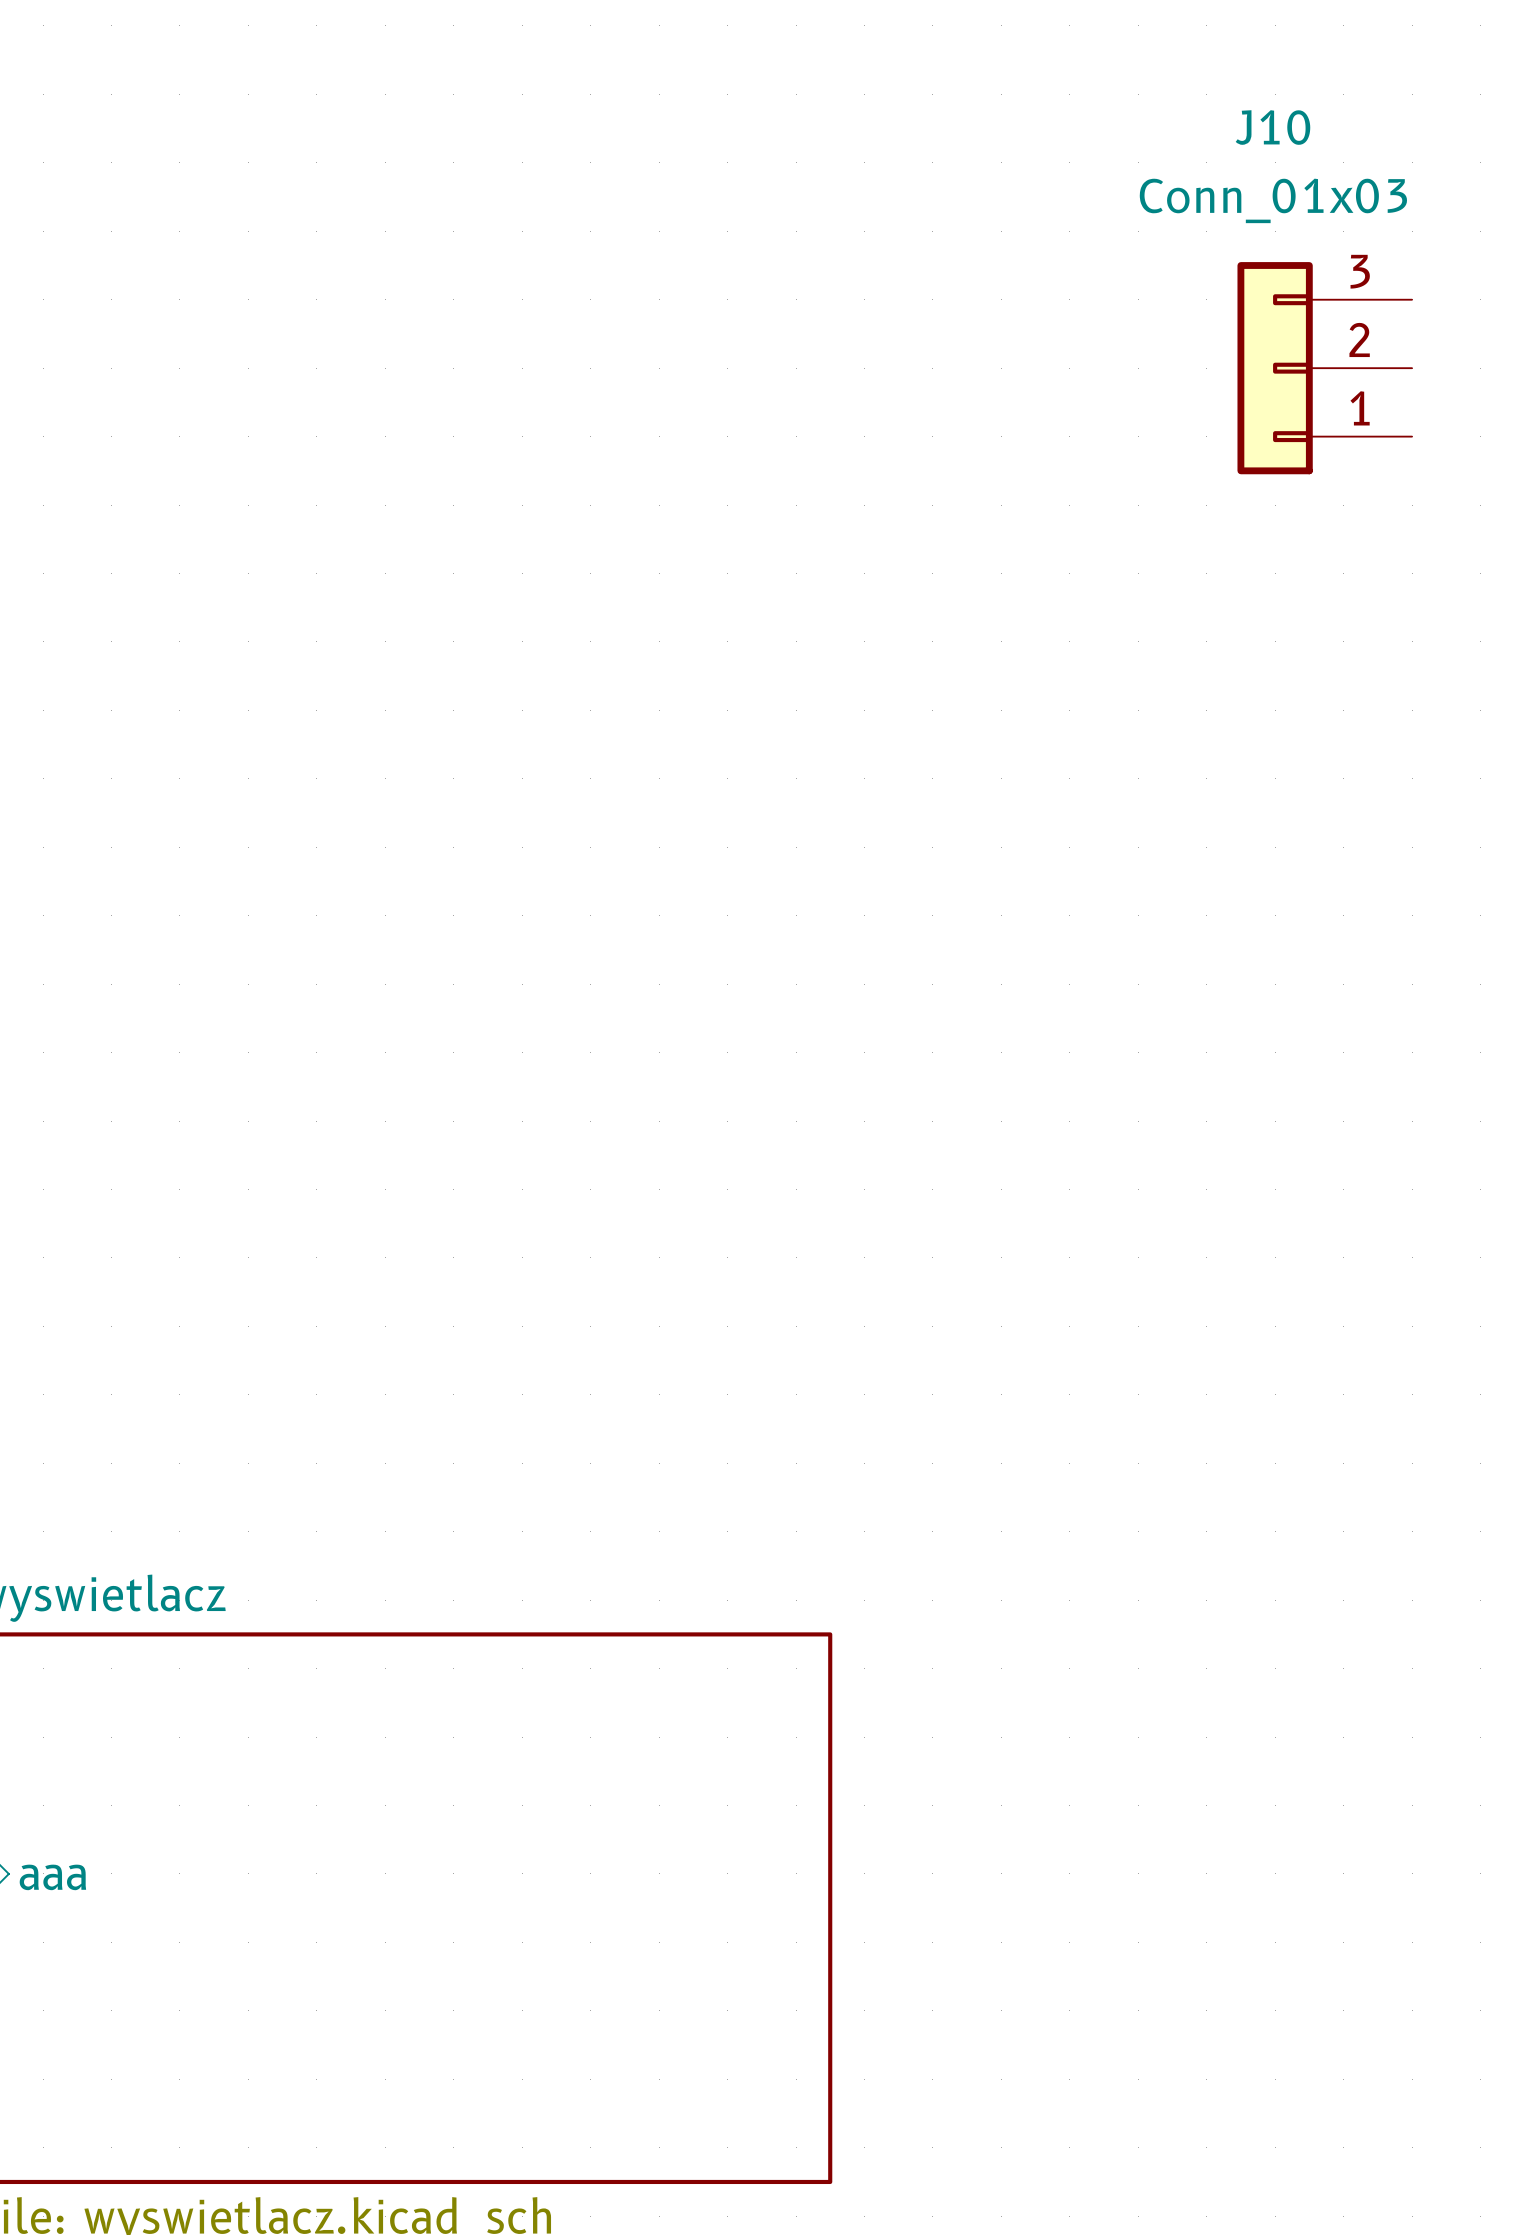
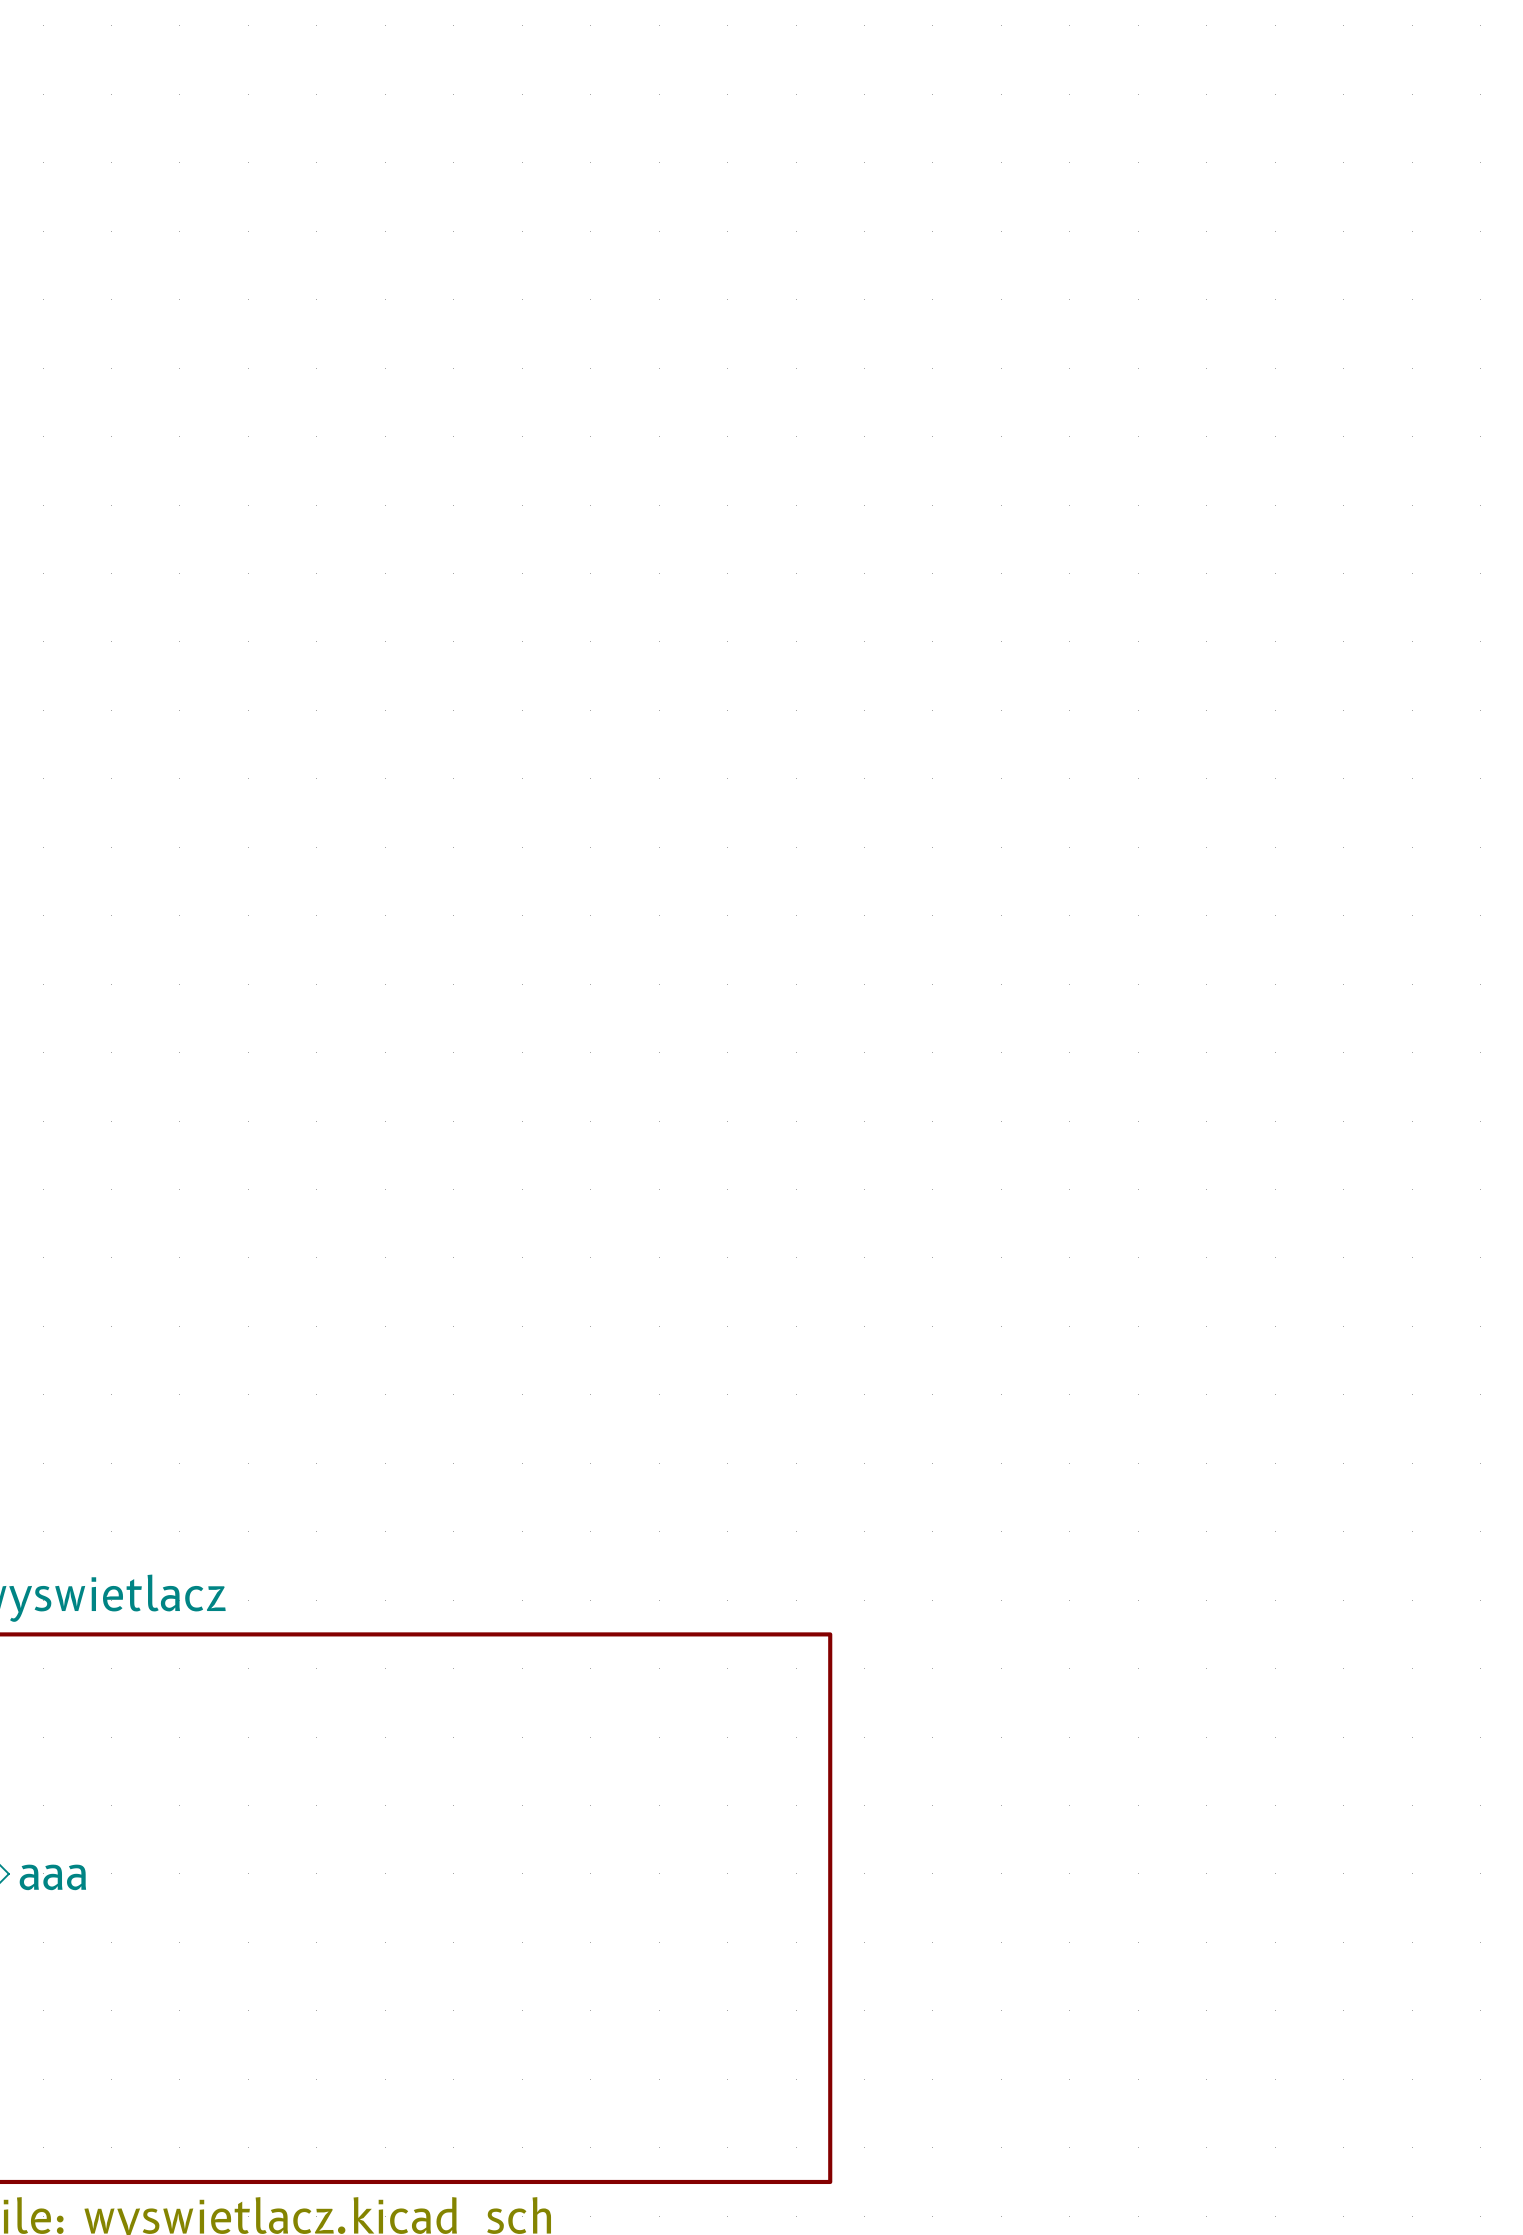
J10: Conn_01x03 (1324, 368) -> none

